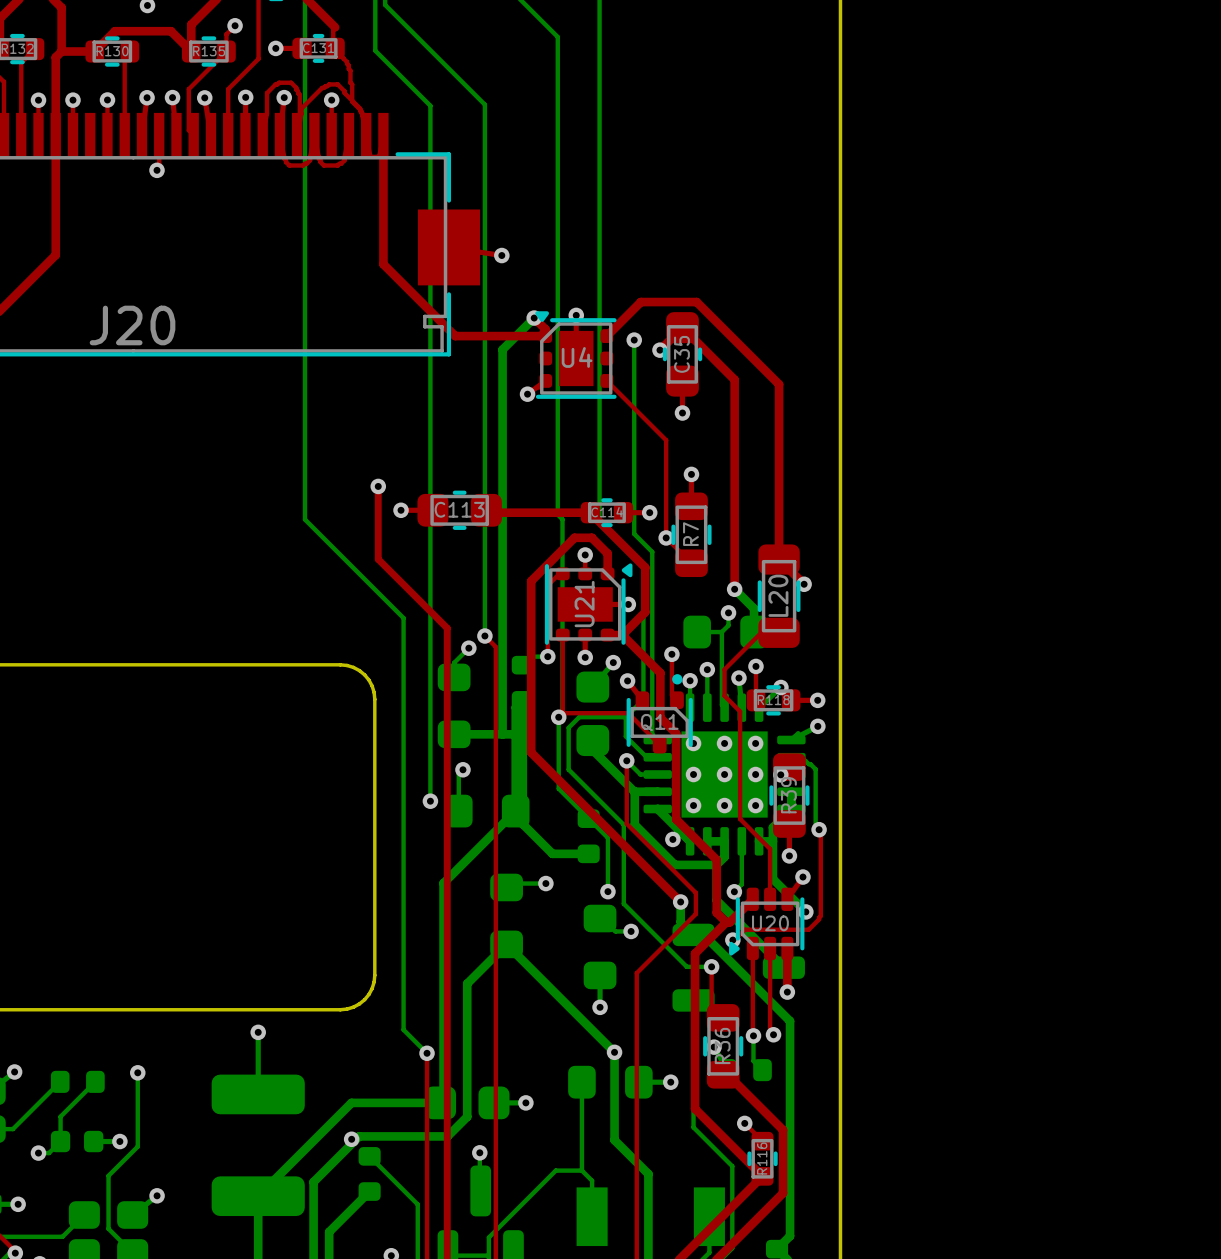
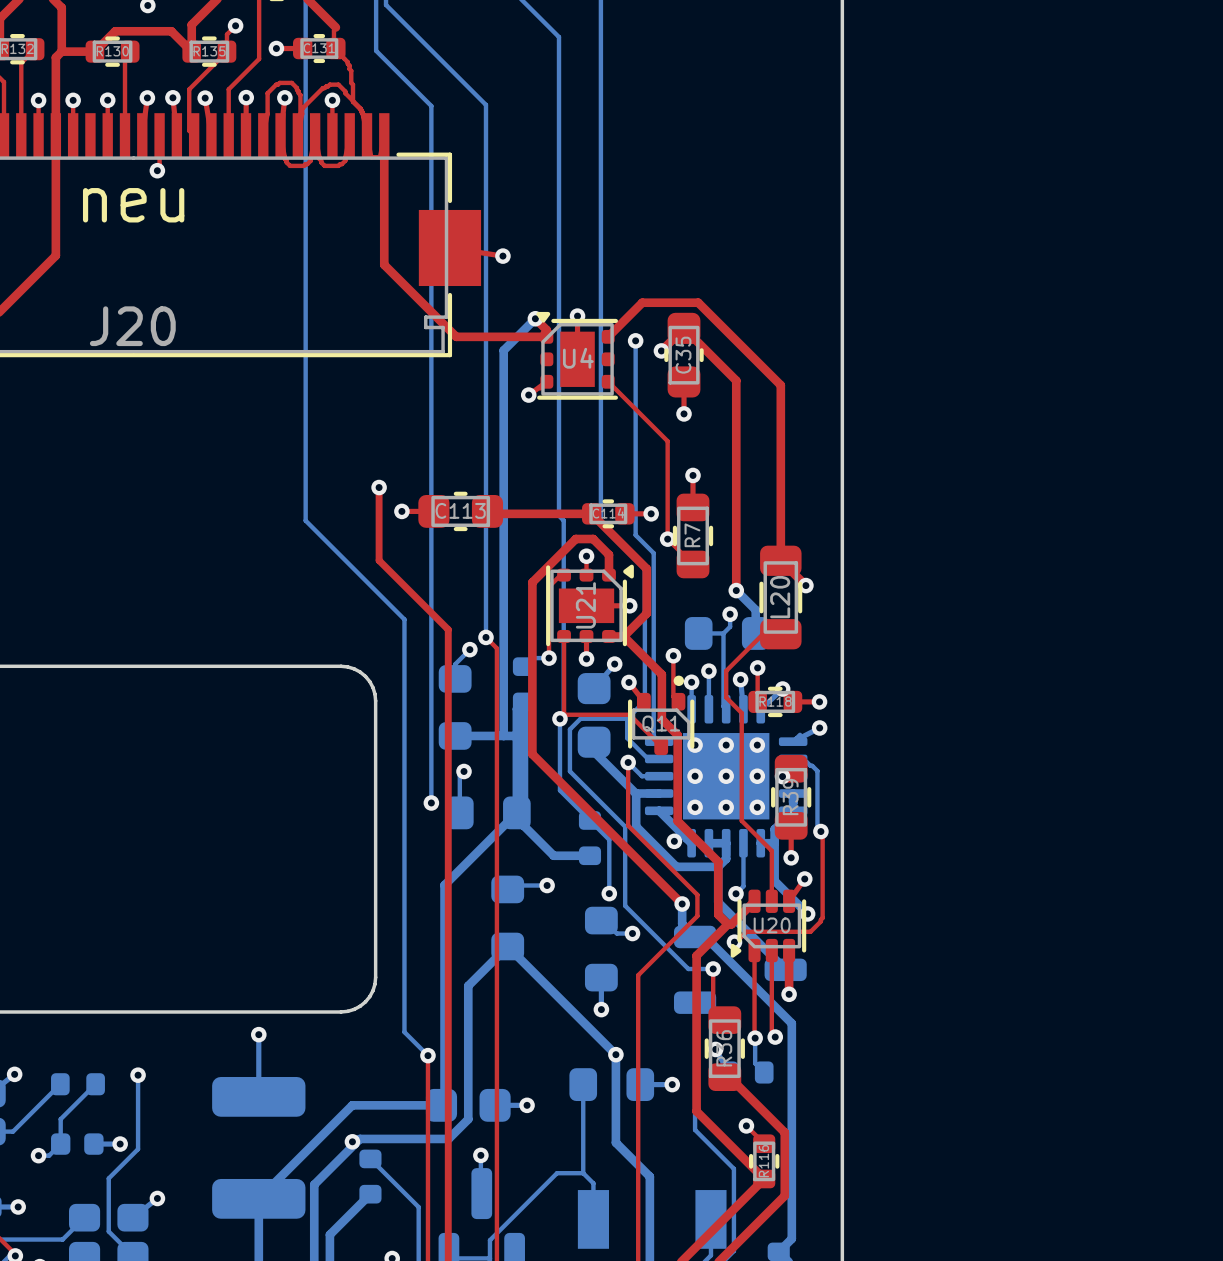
J20 text: none -> neu (133, 205)

